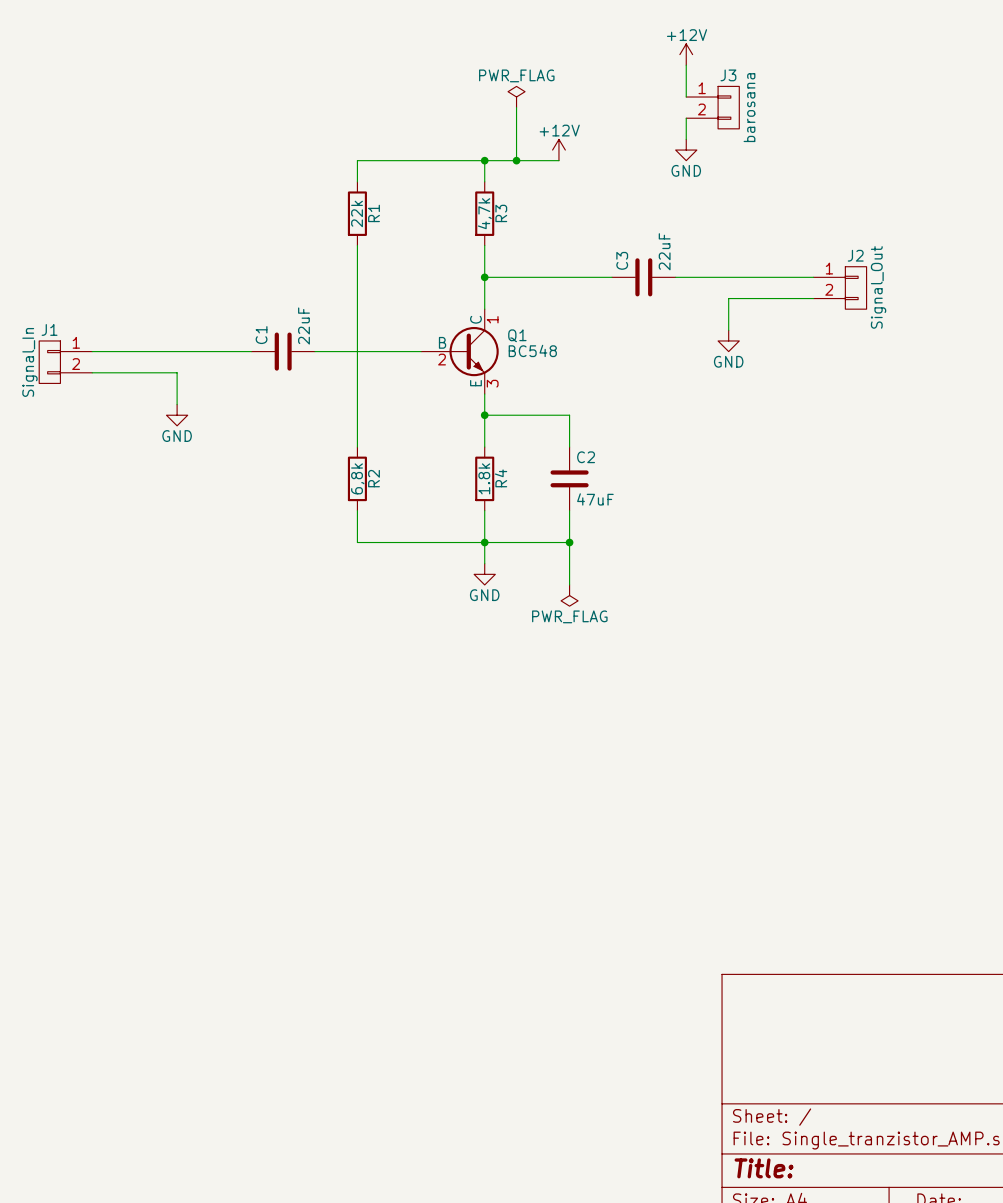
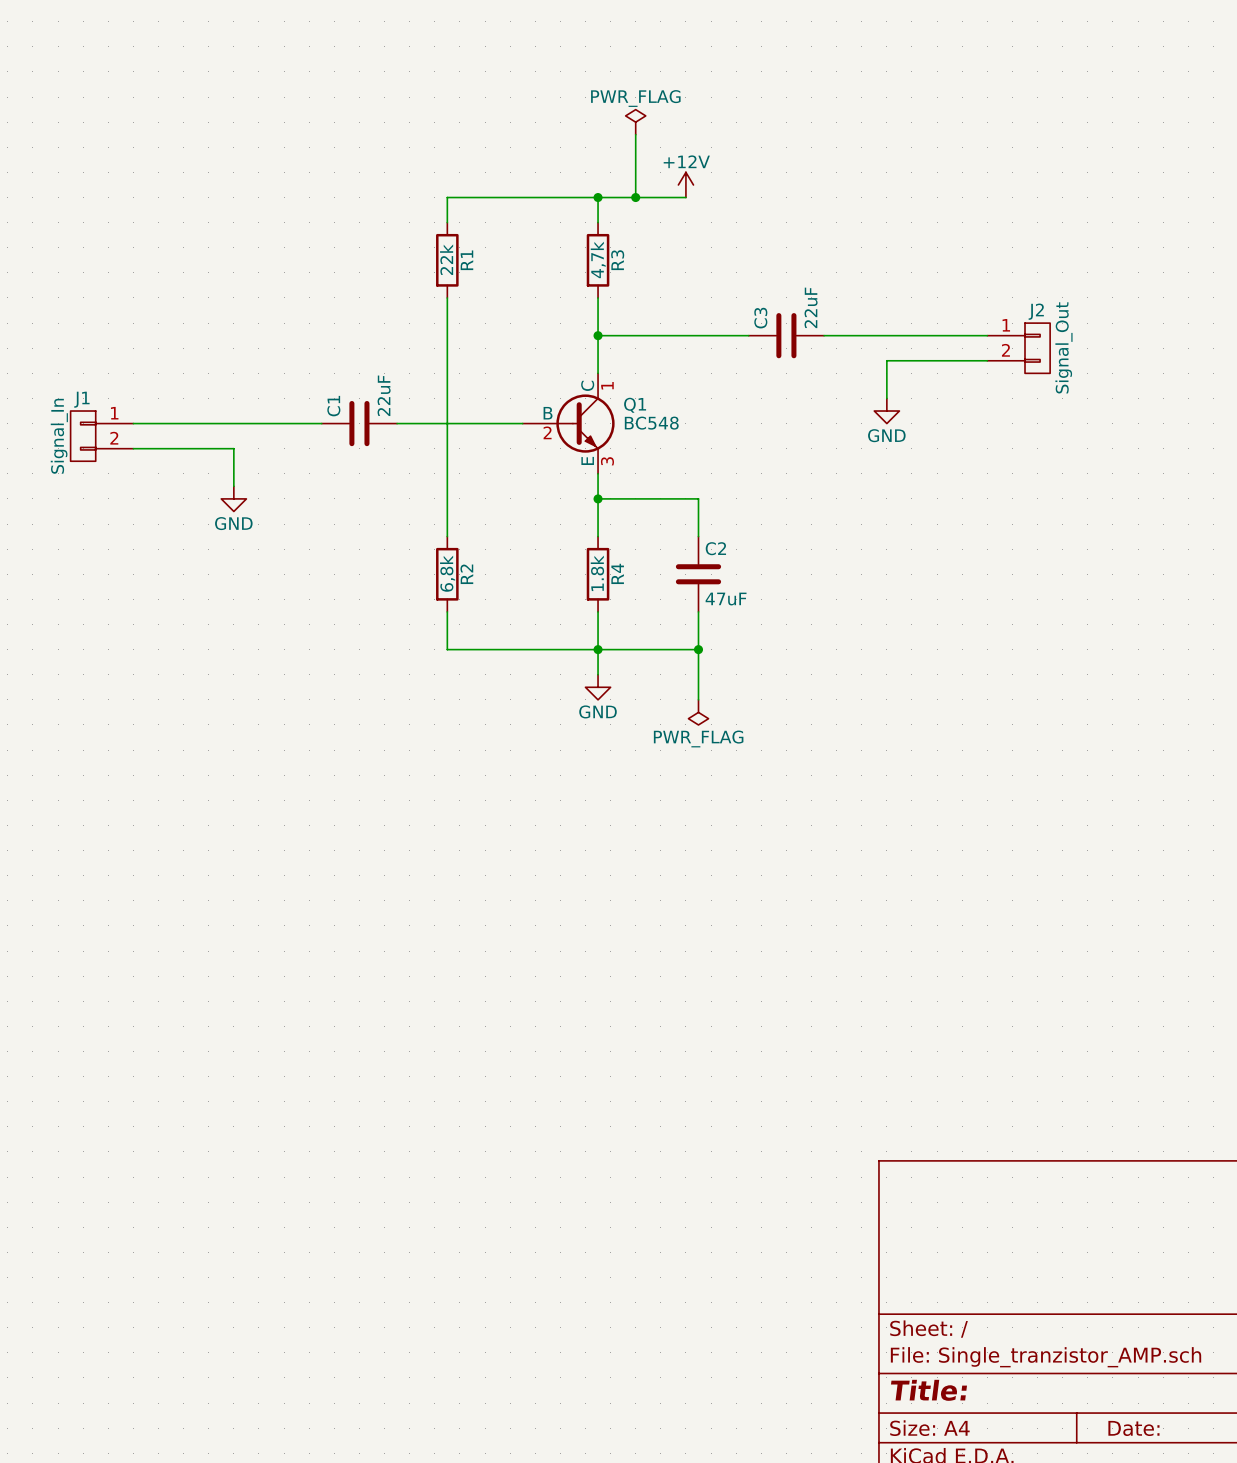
power symbol: +12V (686, 54) -> none
wire: (686, 65) (686, 97) -> none
J3: barosana (712, 107) -> none
wire: (686, 118) (686, 139) -> none
power symbol: GND (686, 150) -> none

